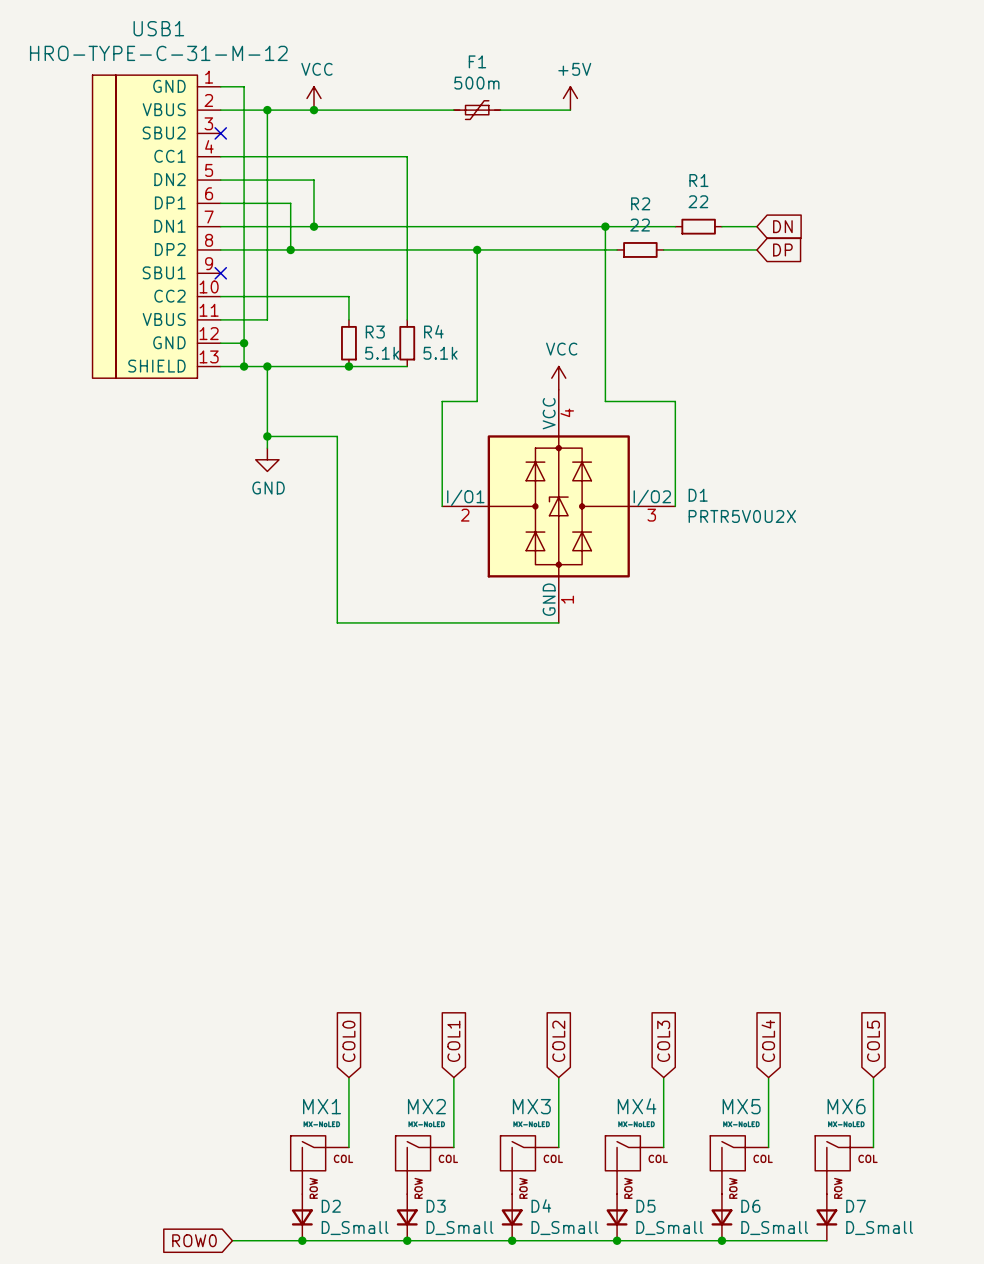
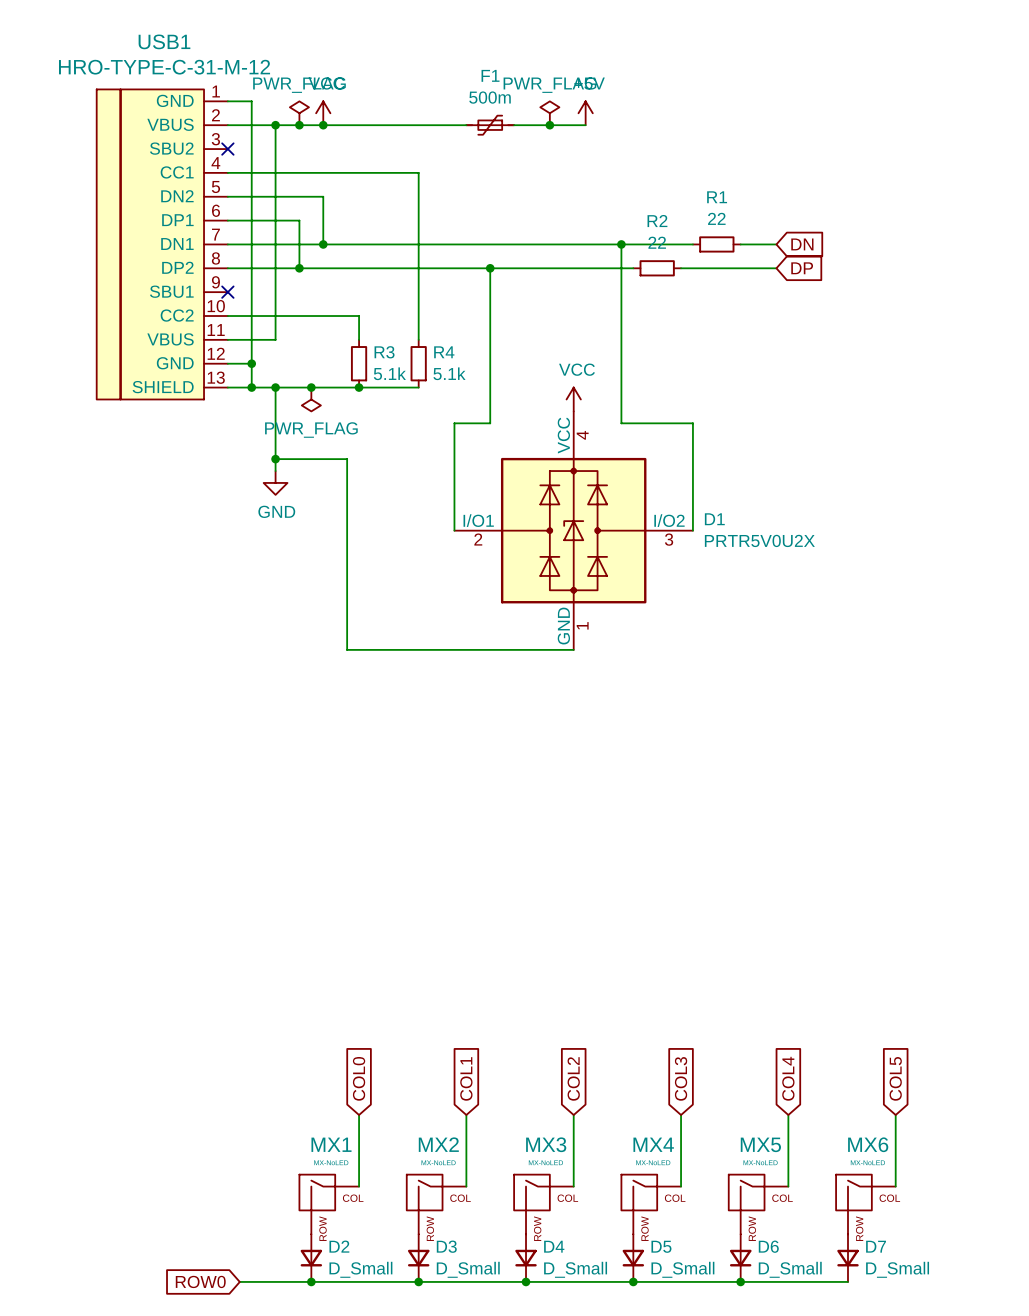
power symbol: none -> PWR_FLAG (299, 113)
power symbol: none -> PWR_FLAG (549, 113)
junction: none -> (299, 125)
junction: none -> (549, 125)
junction: none -> (311, 387)
power symbol: none -> PWR_FLAG (311, 399)

